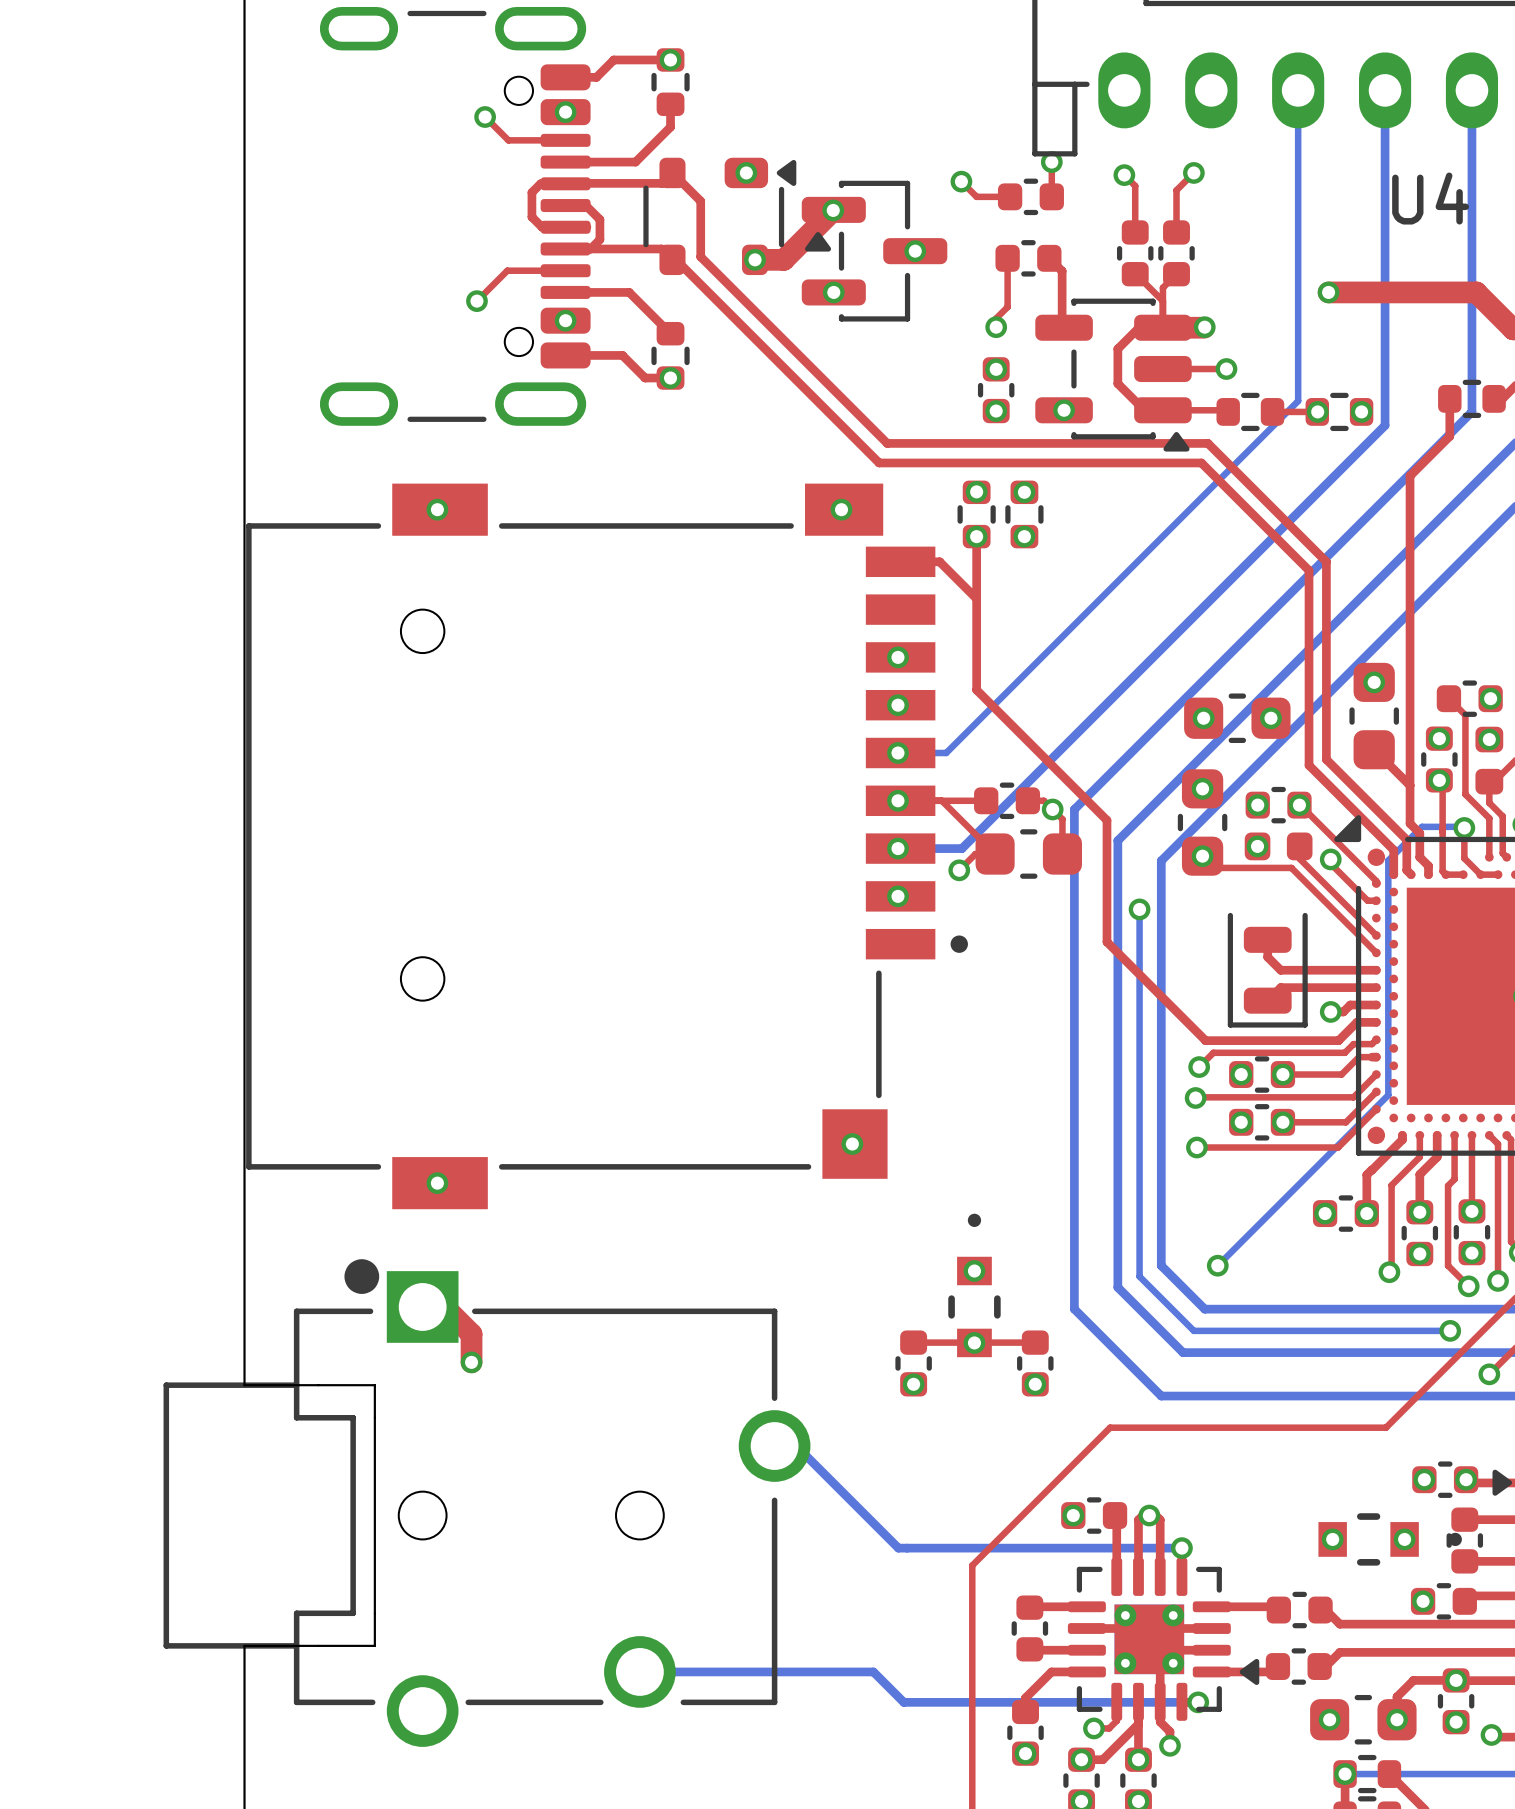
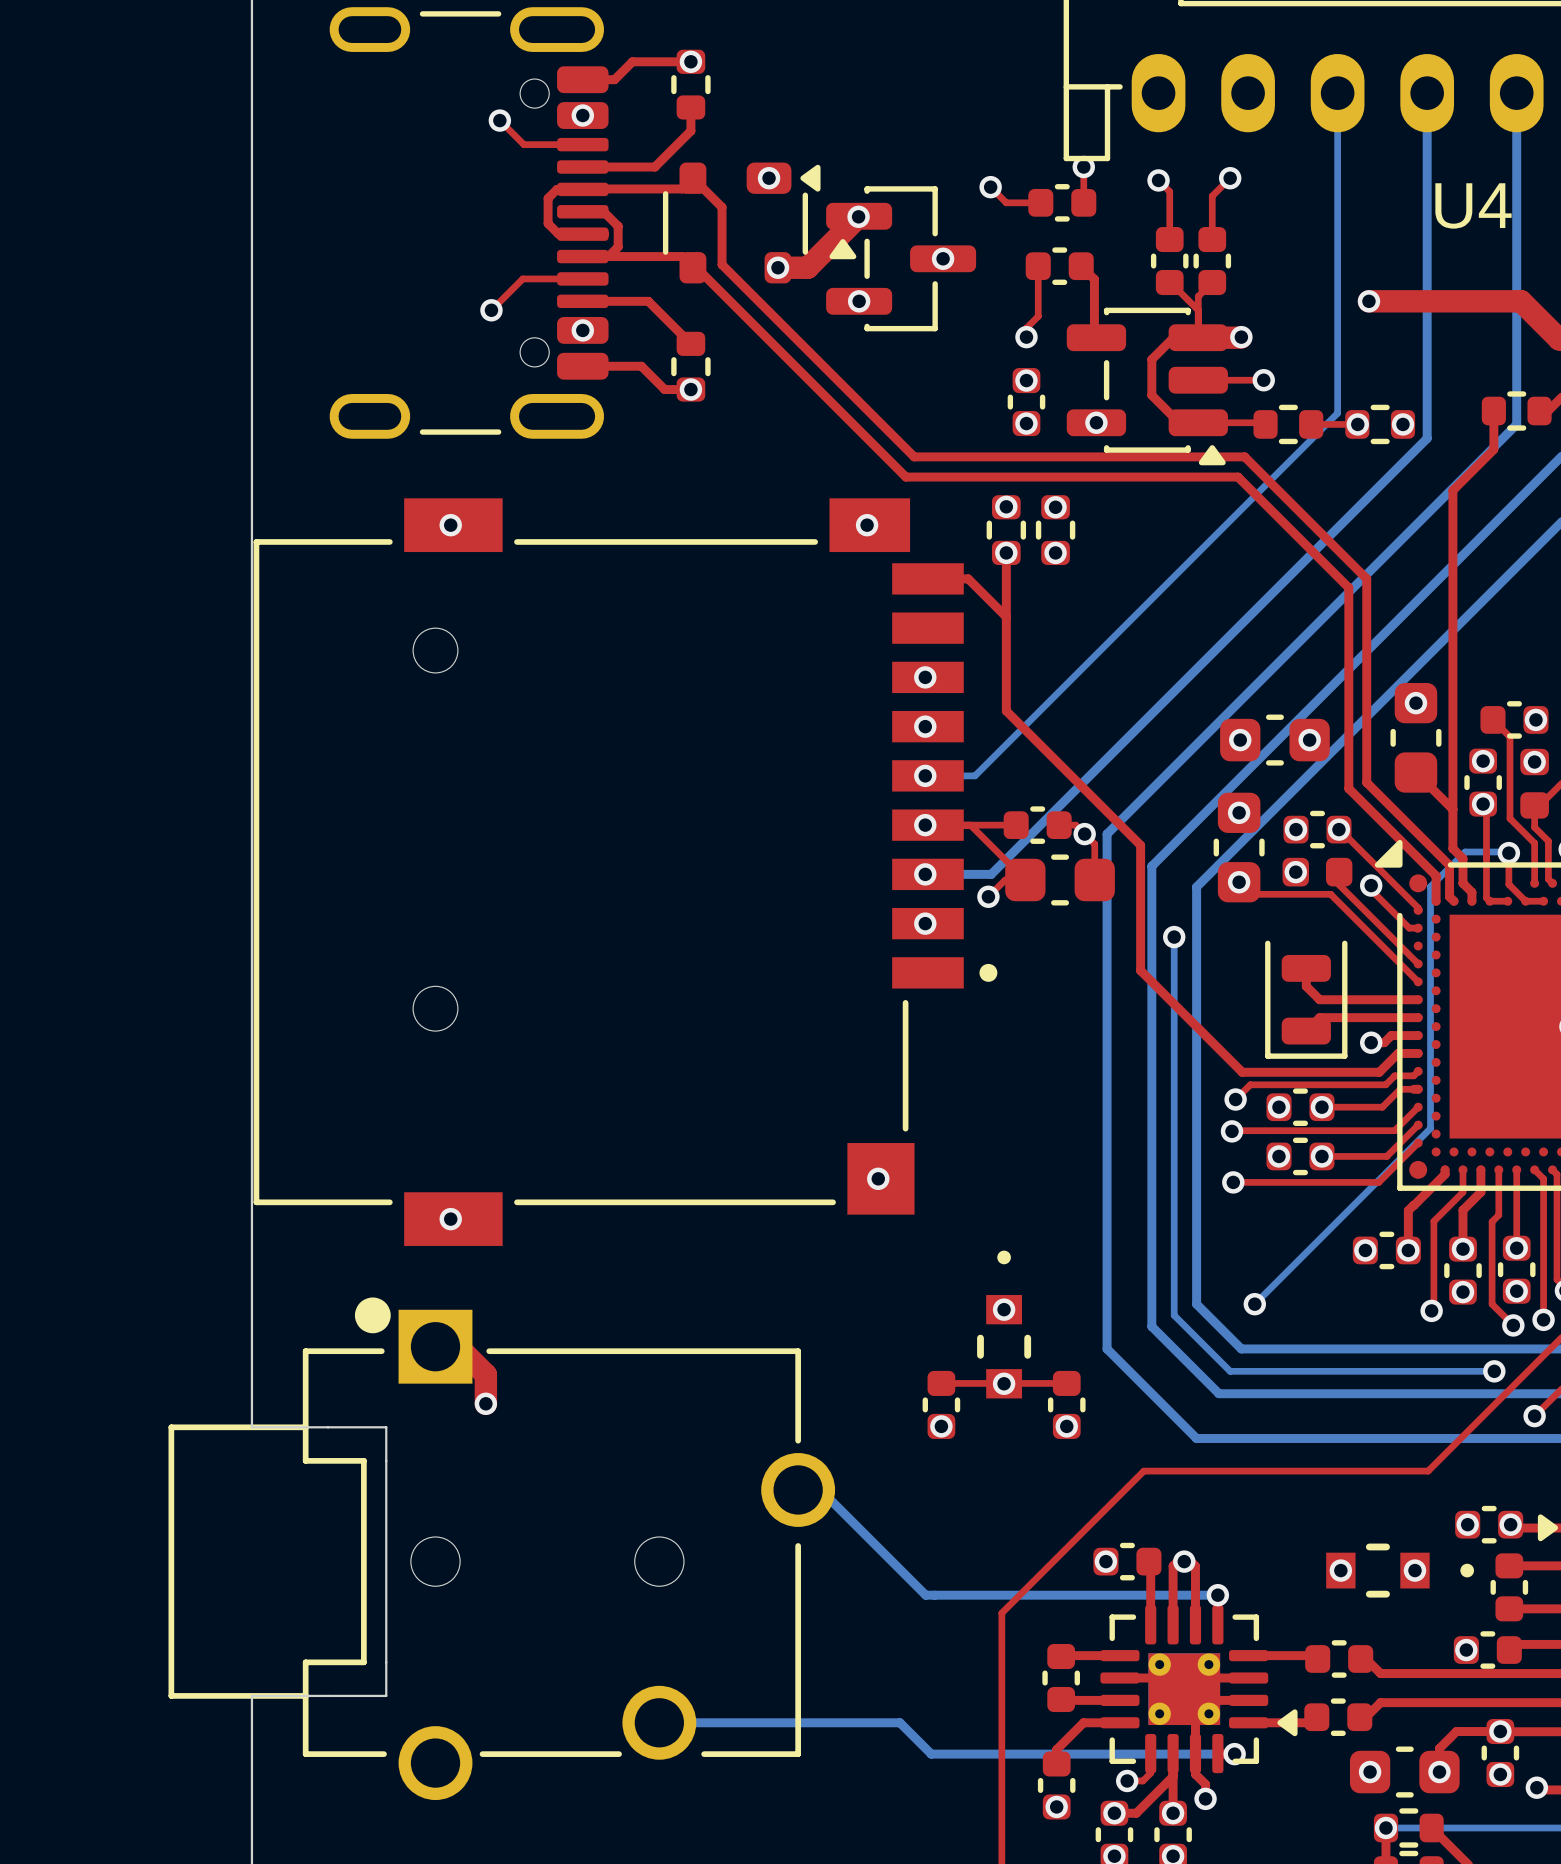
via: none -> (1340, 1570)
via: none -> (1414, 1570)
via: (1332, 1539) -> none
part position: (1390, 1539) -> (1400, 1570)
via: (1404, 1539) -> none

